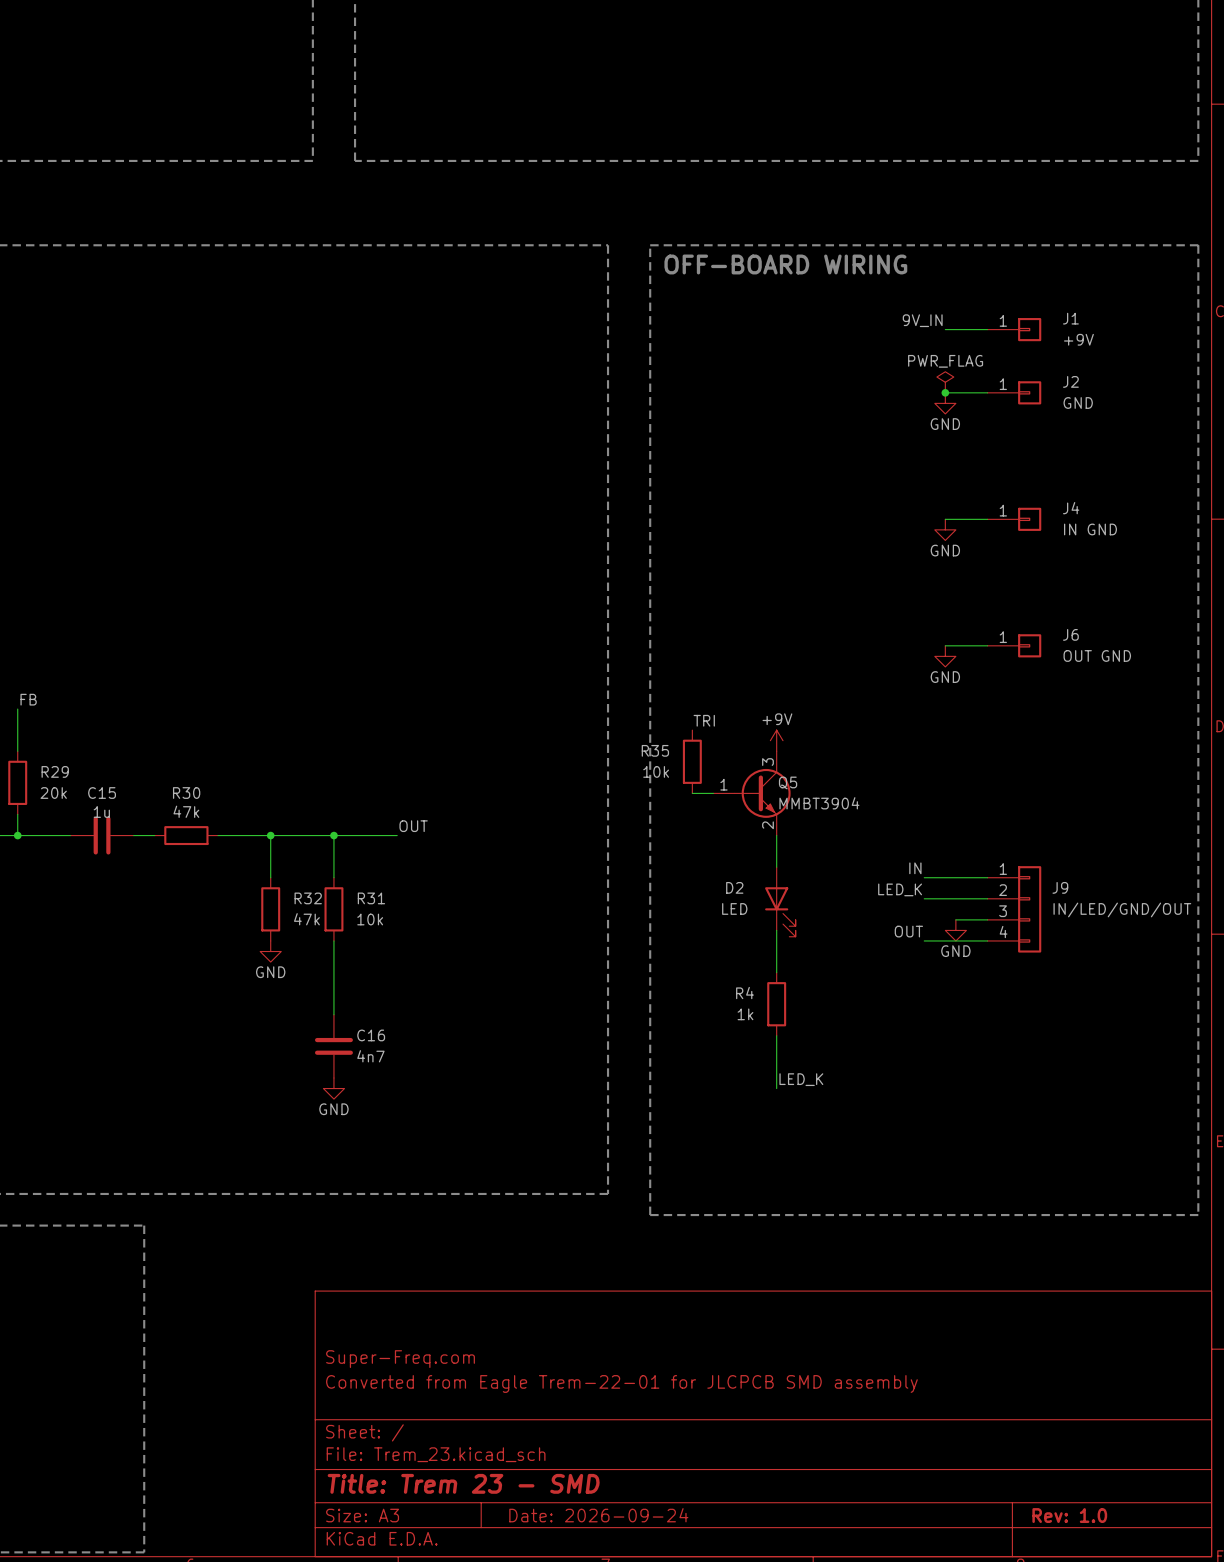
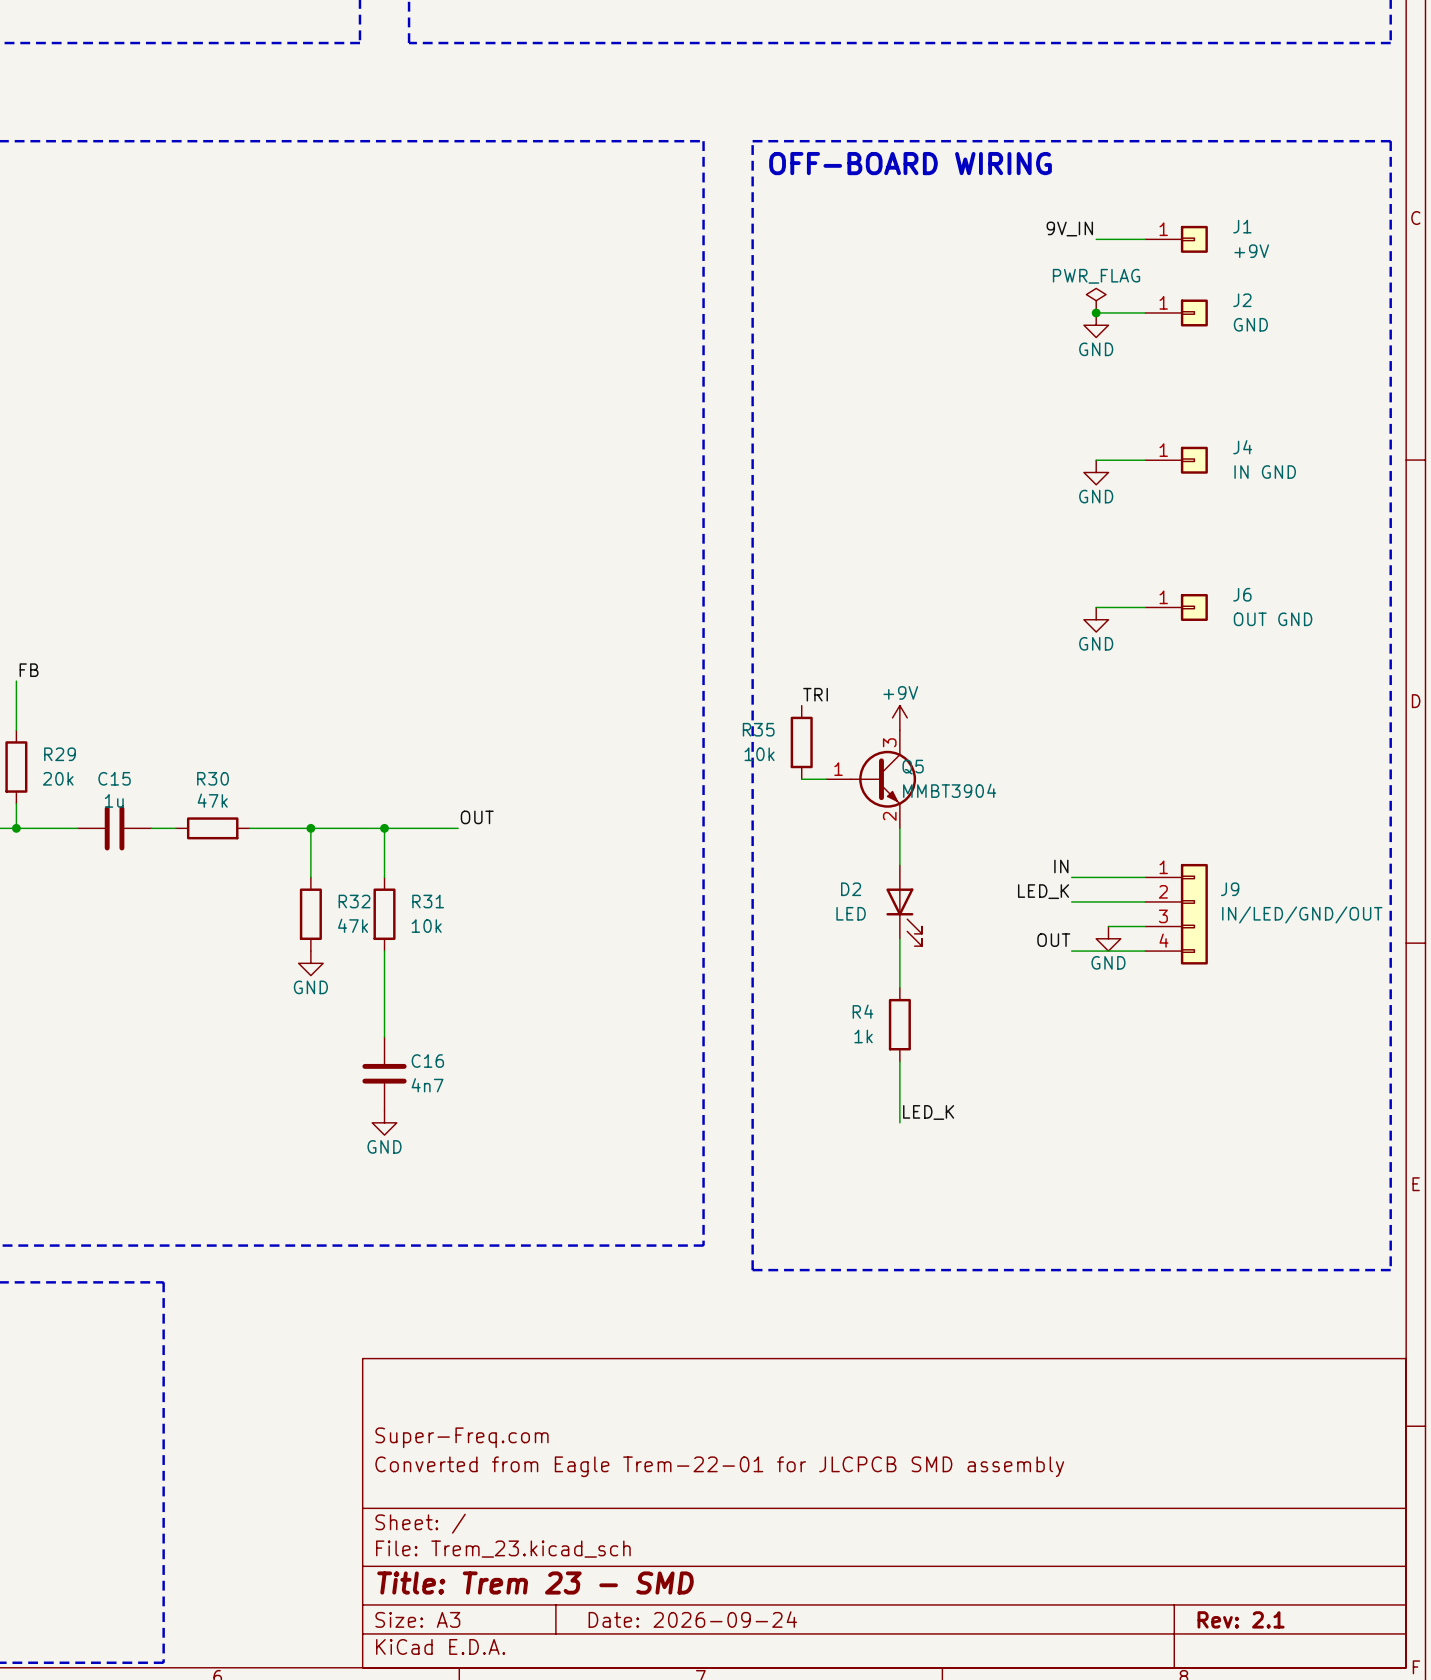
title block: Rev: 1.0 (1069, 1515) -> Rev: 2.1 (1241, 1619)

